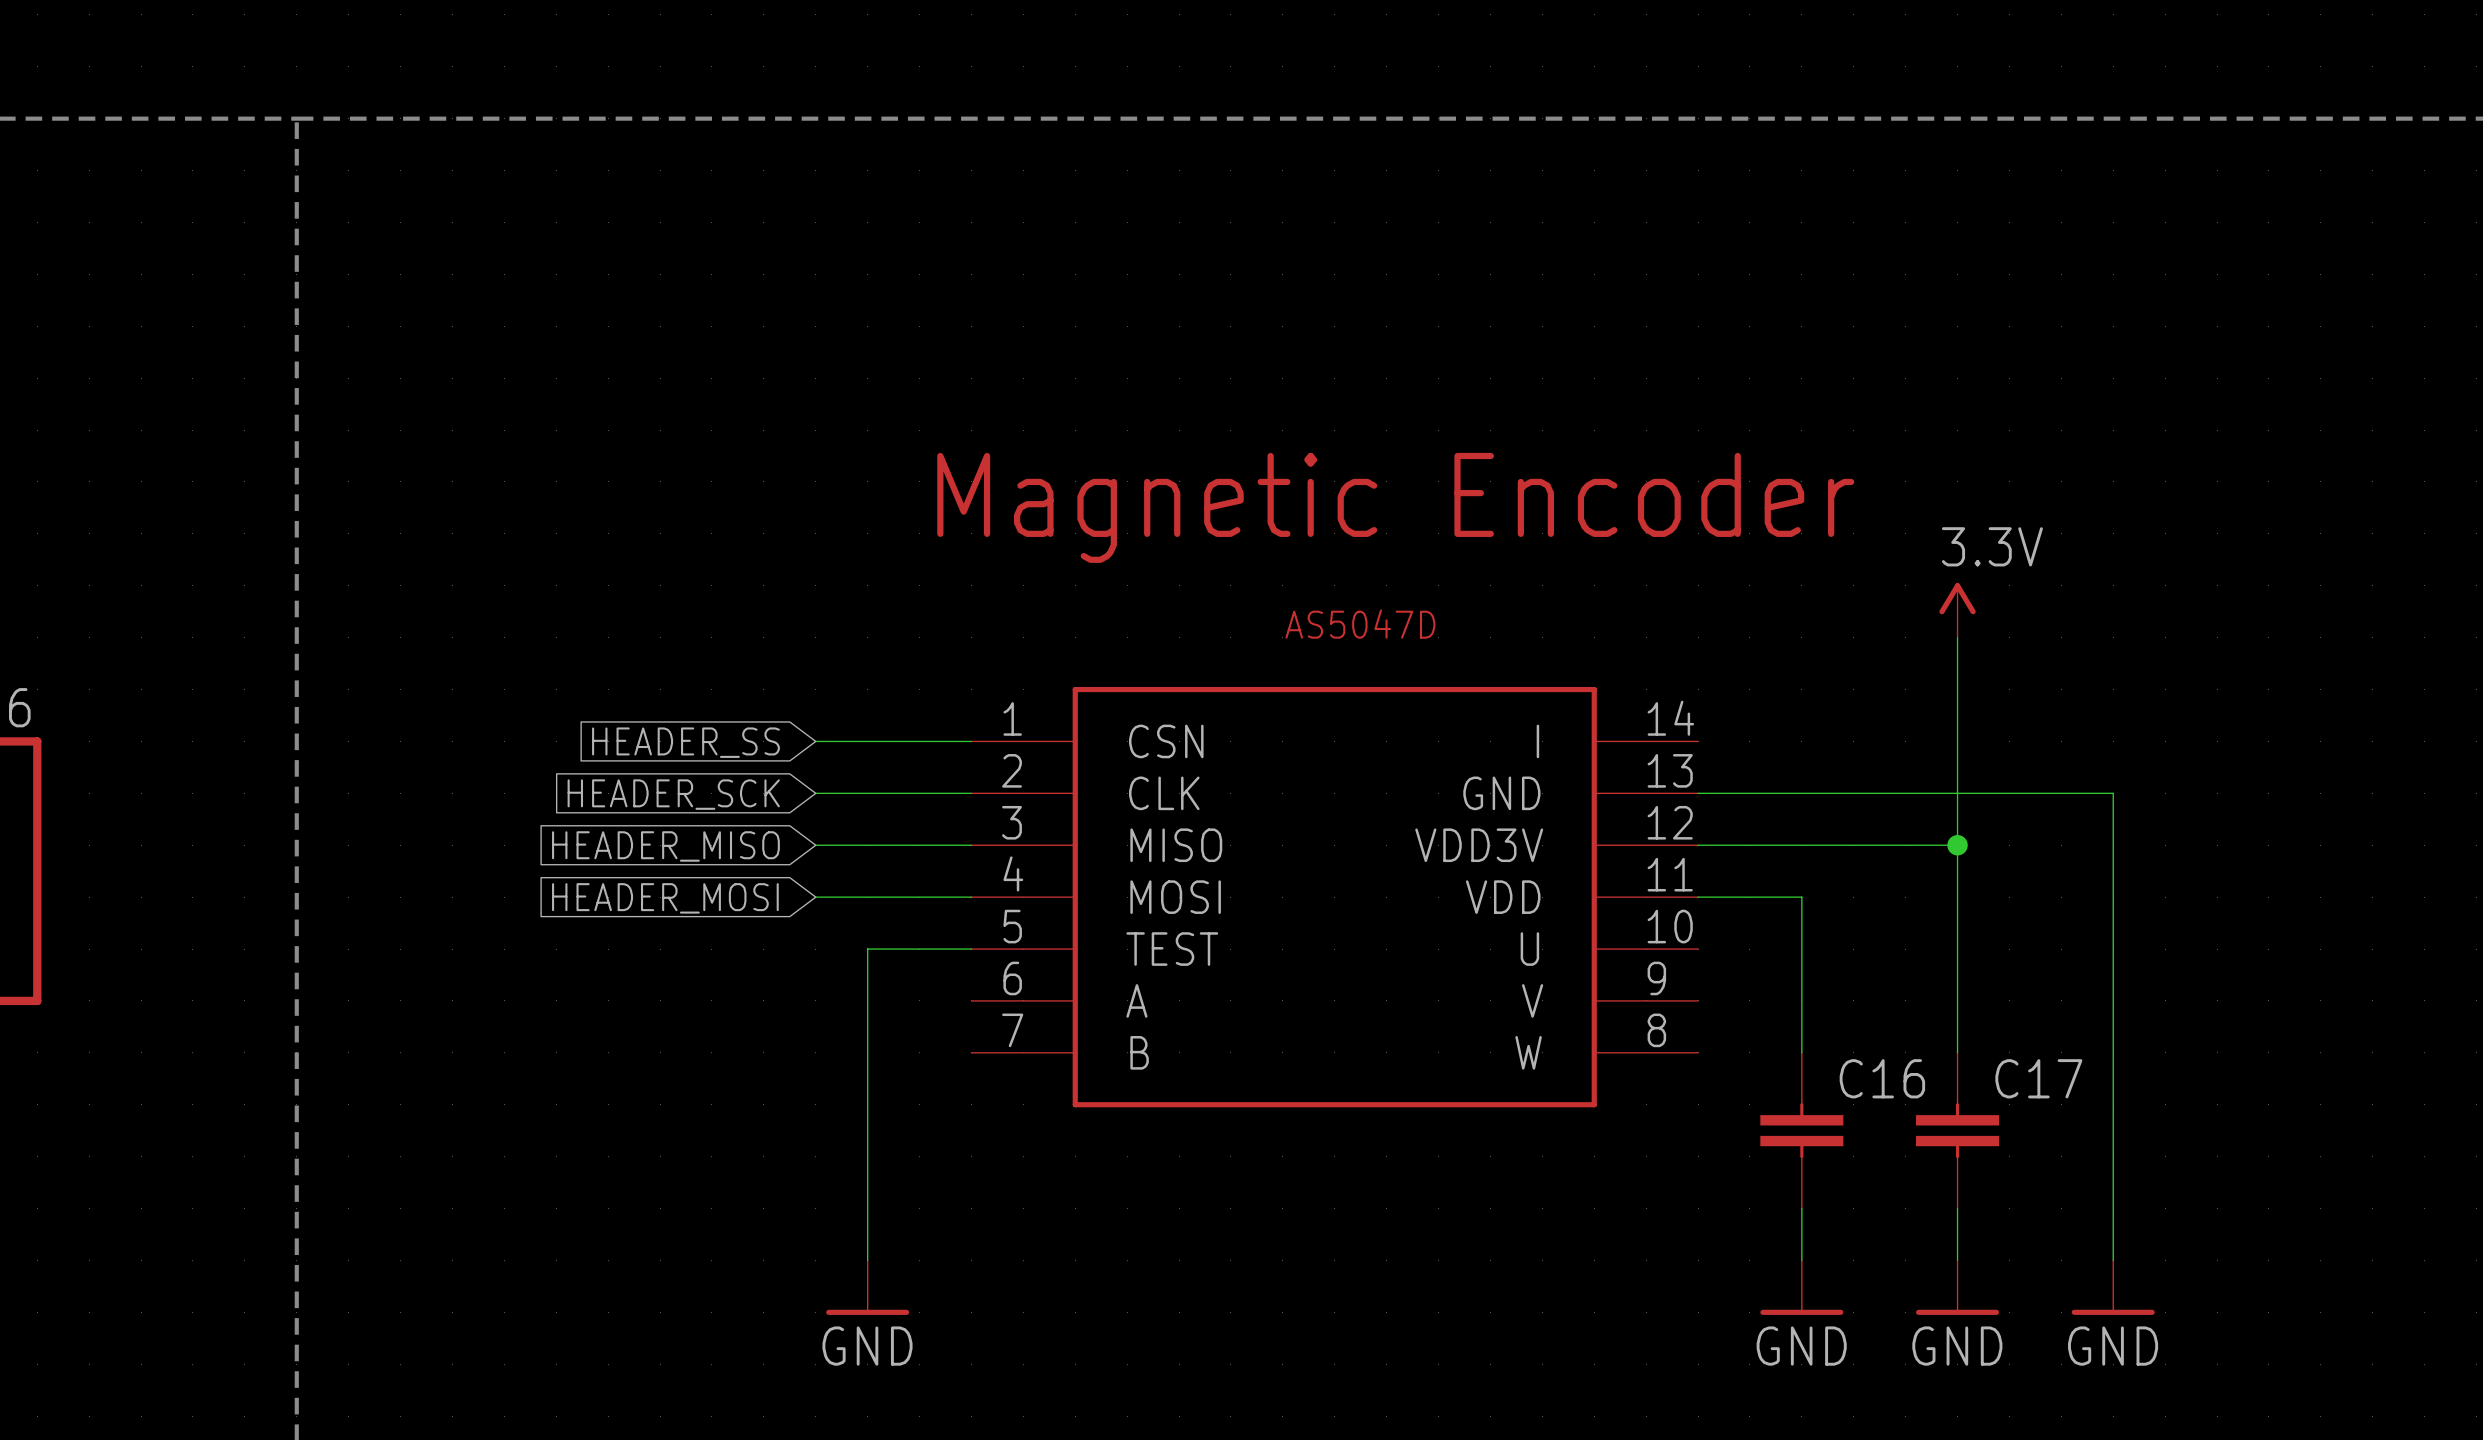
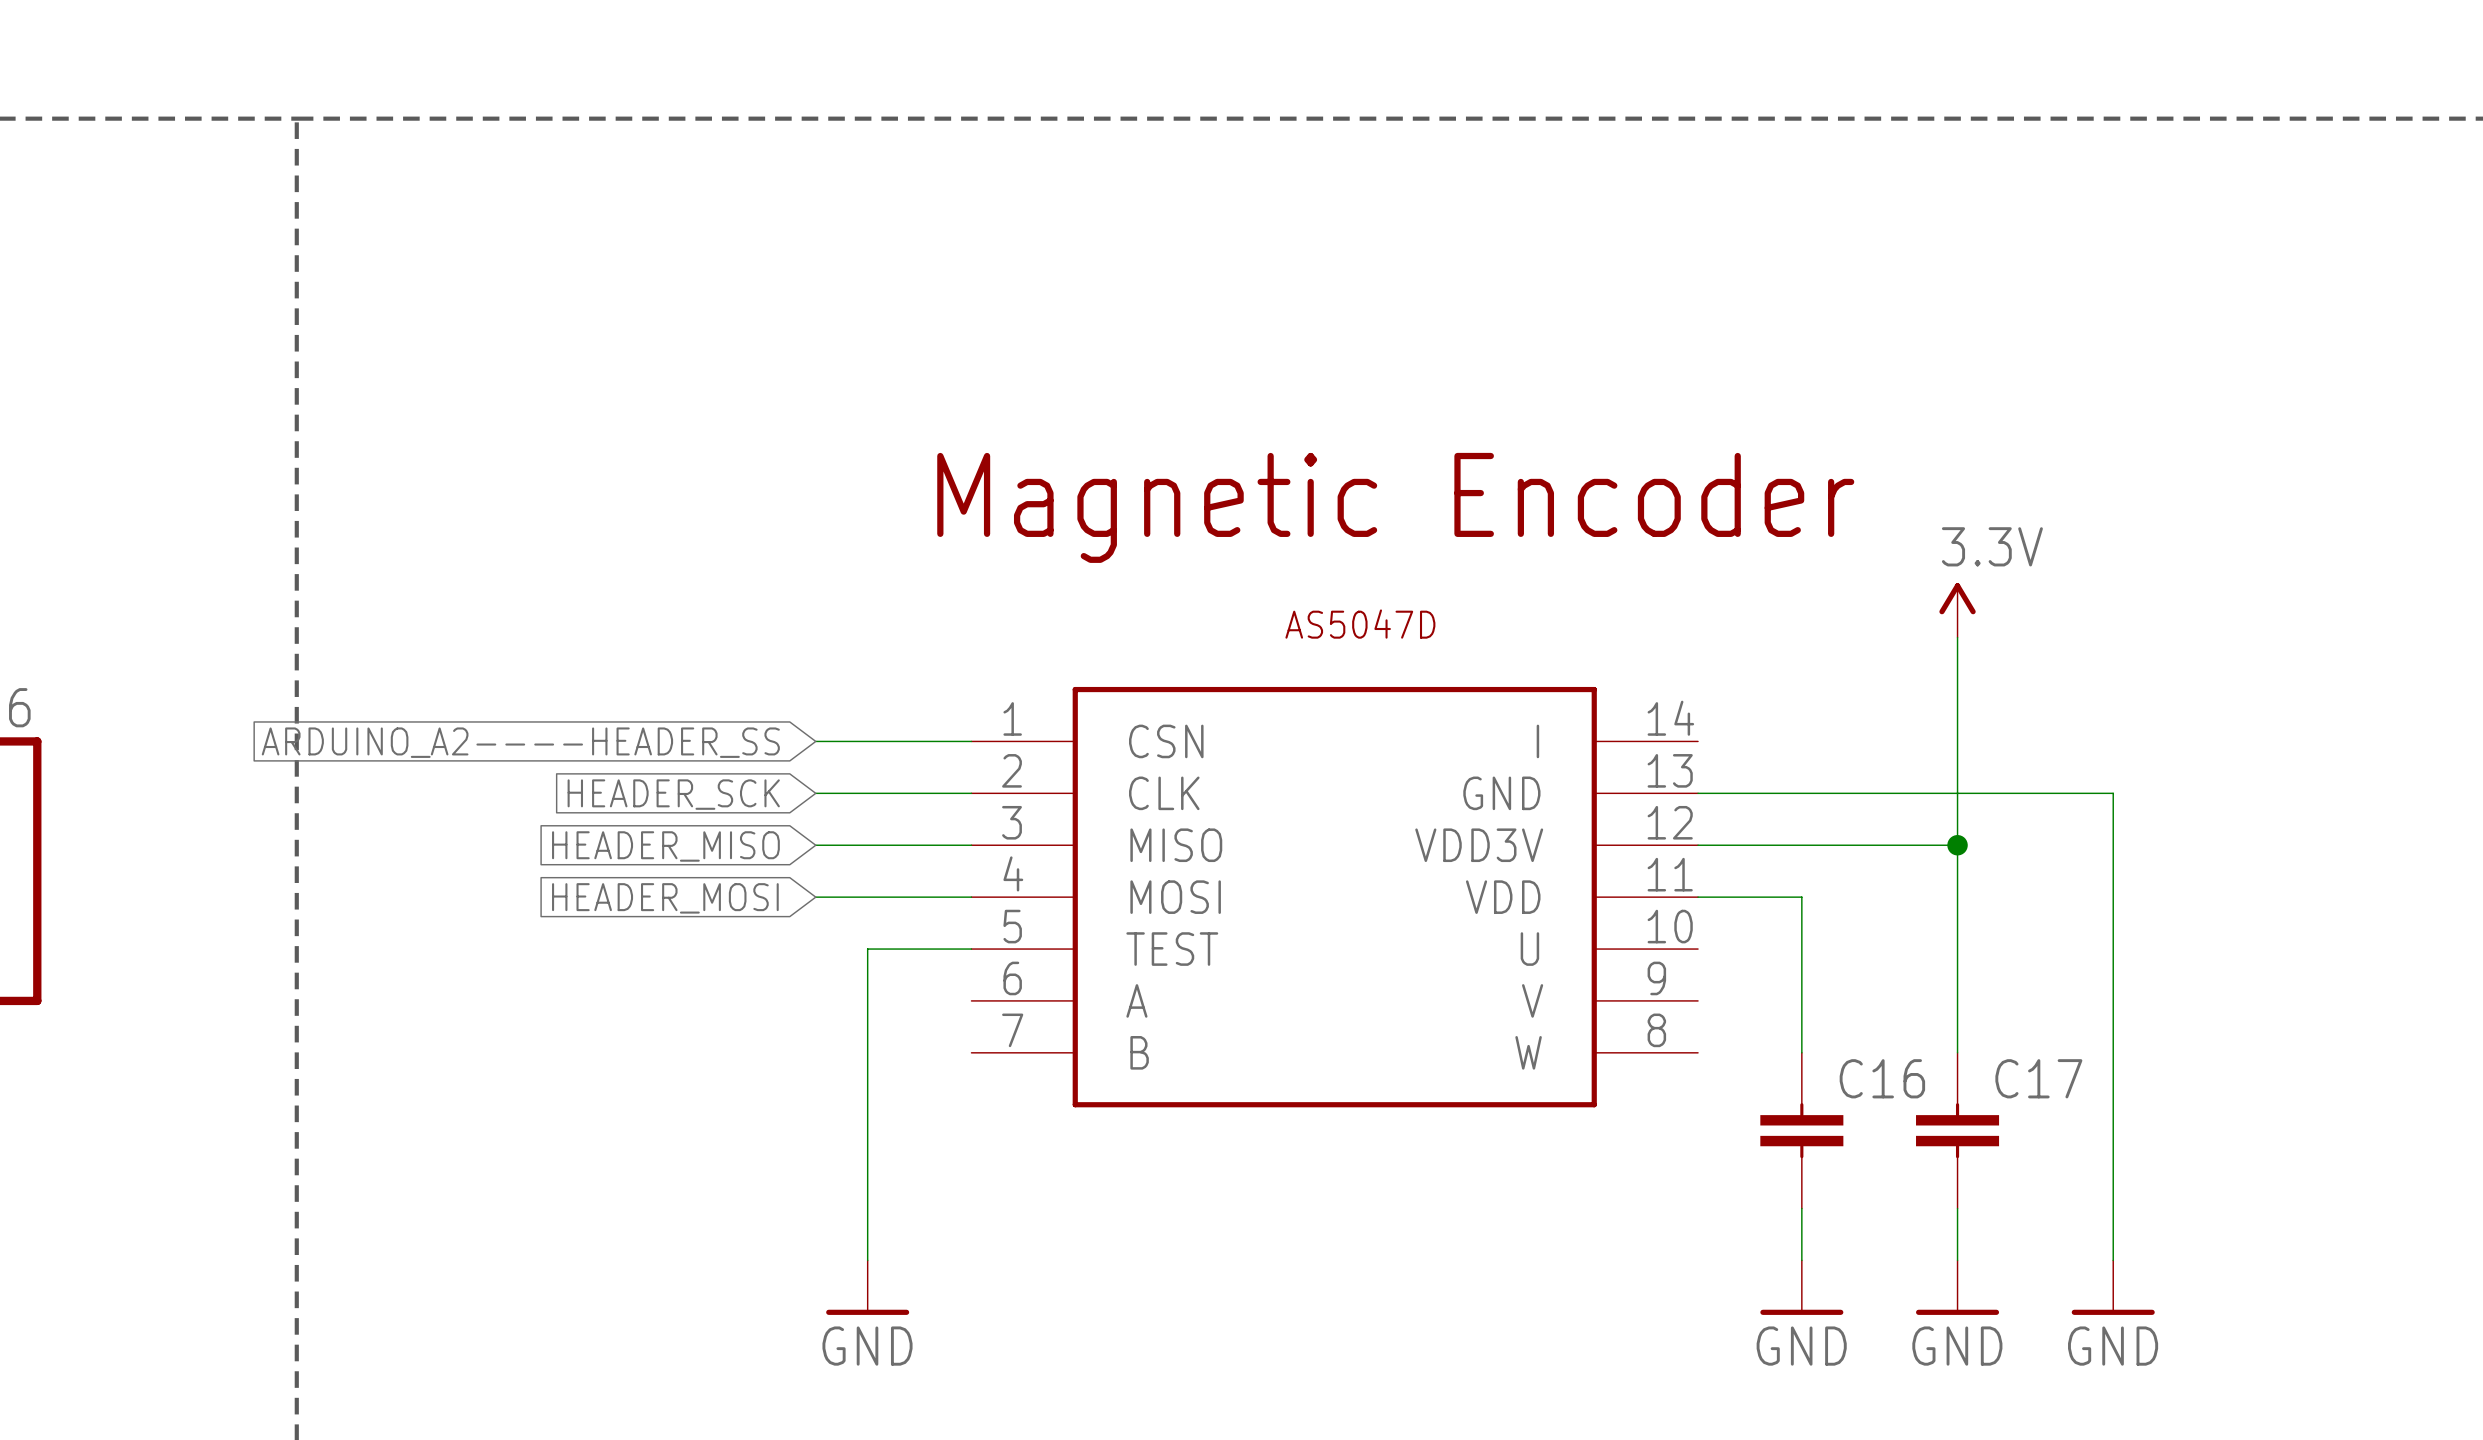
global label: HEADER_SS (685, 742) -> ARDUINO_A2----HEADER_SS (520, 742)

